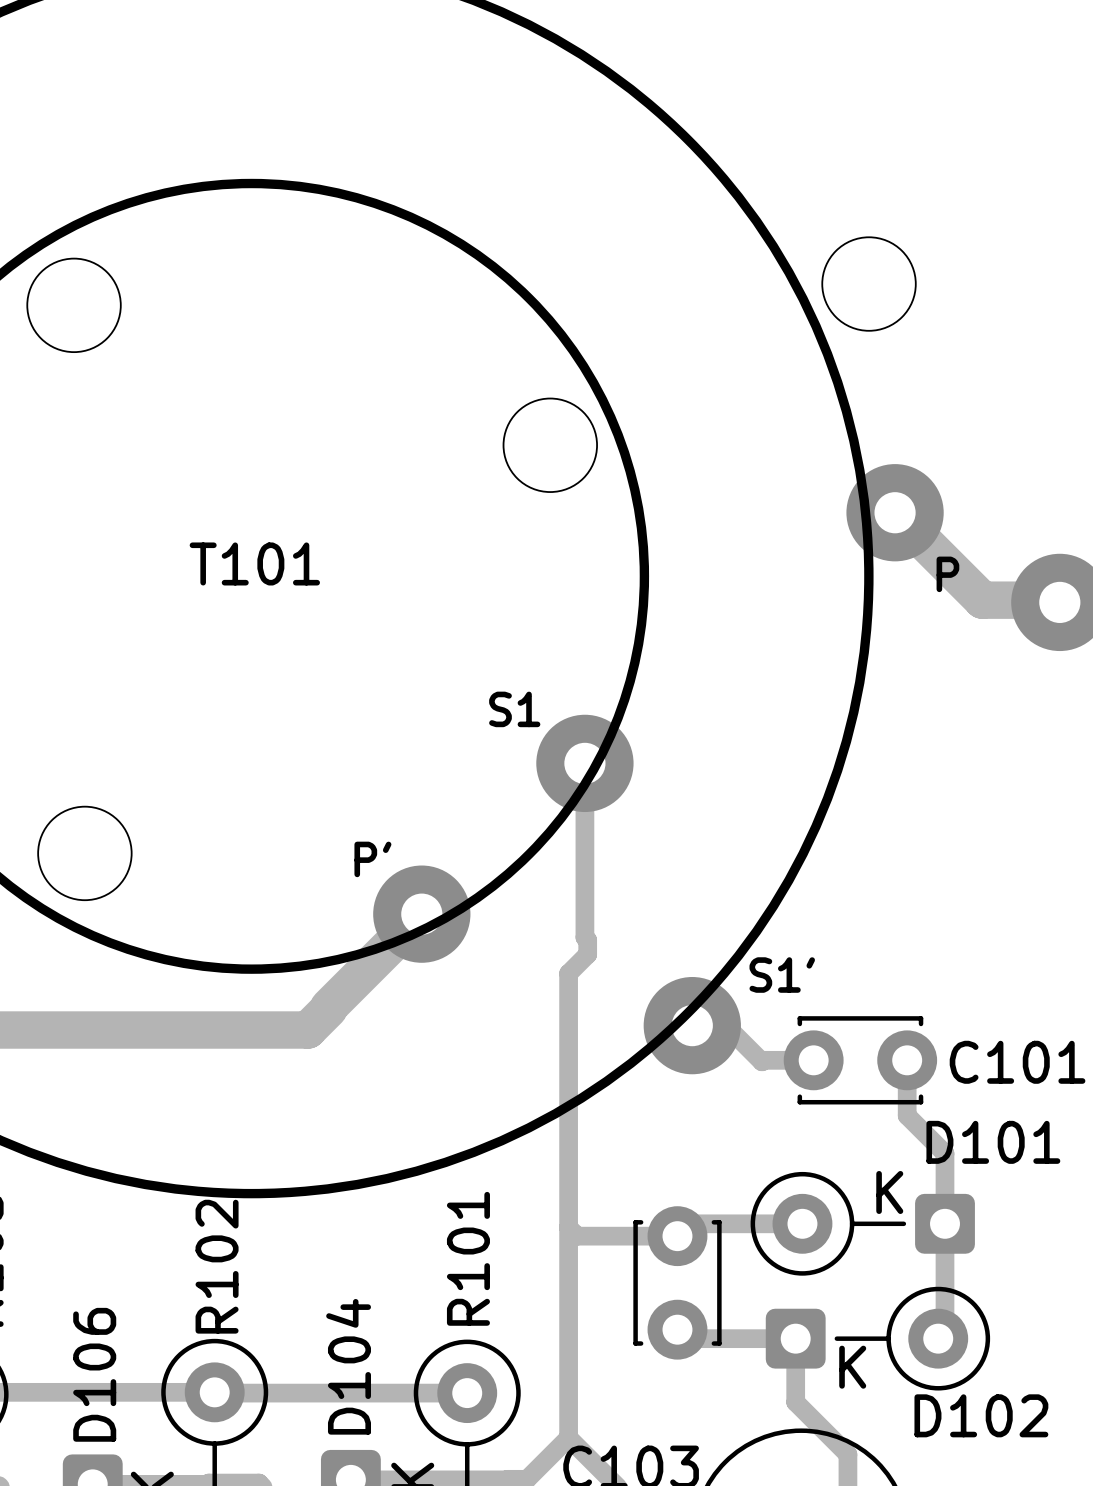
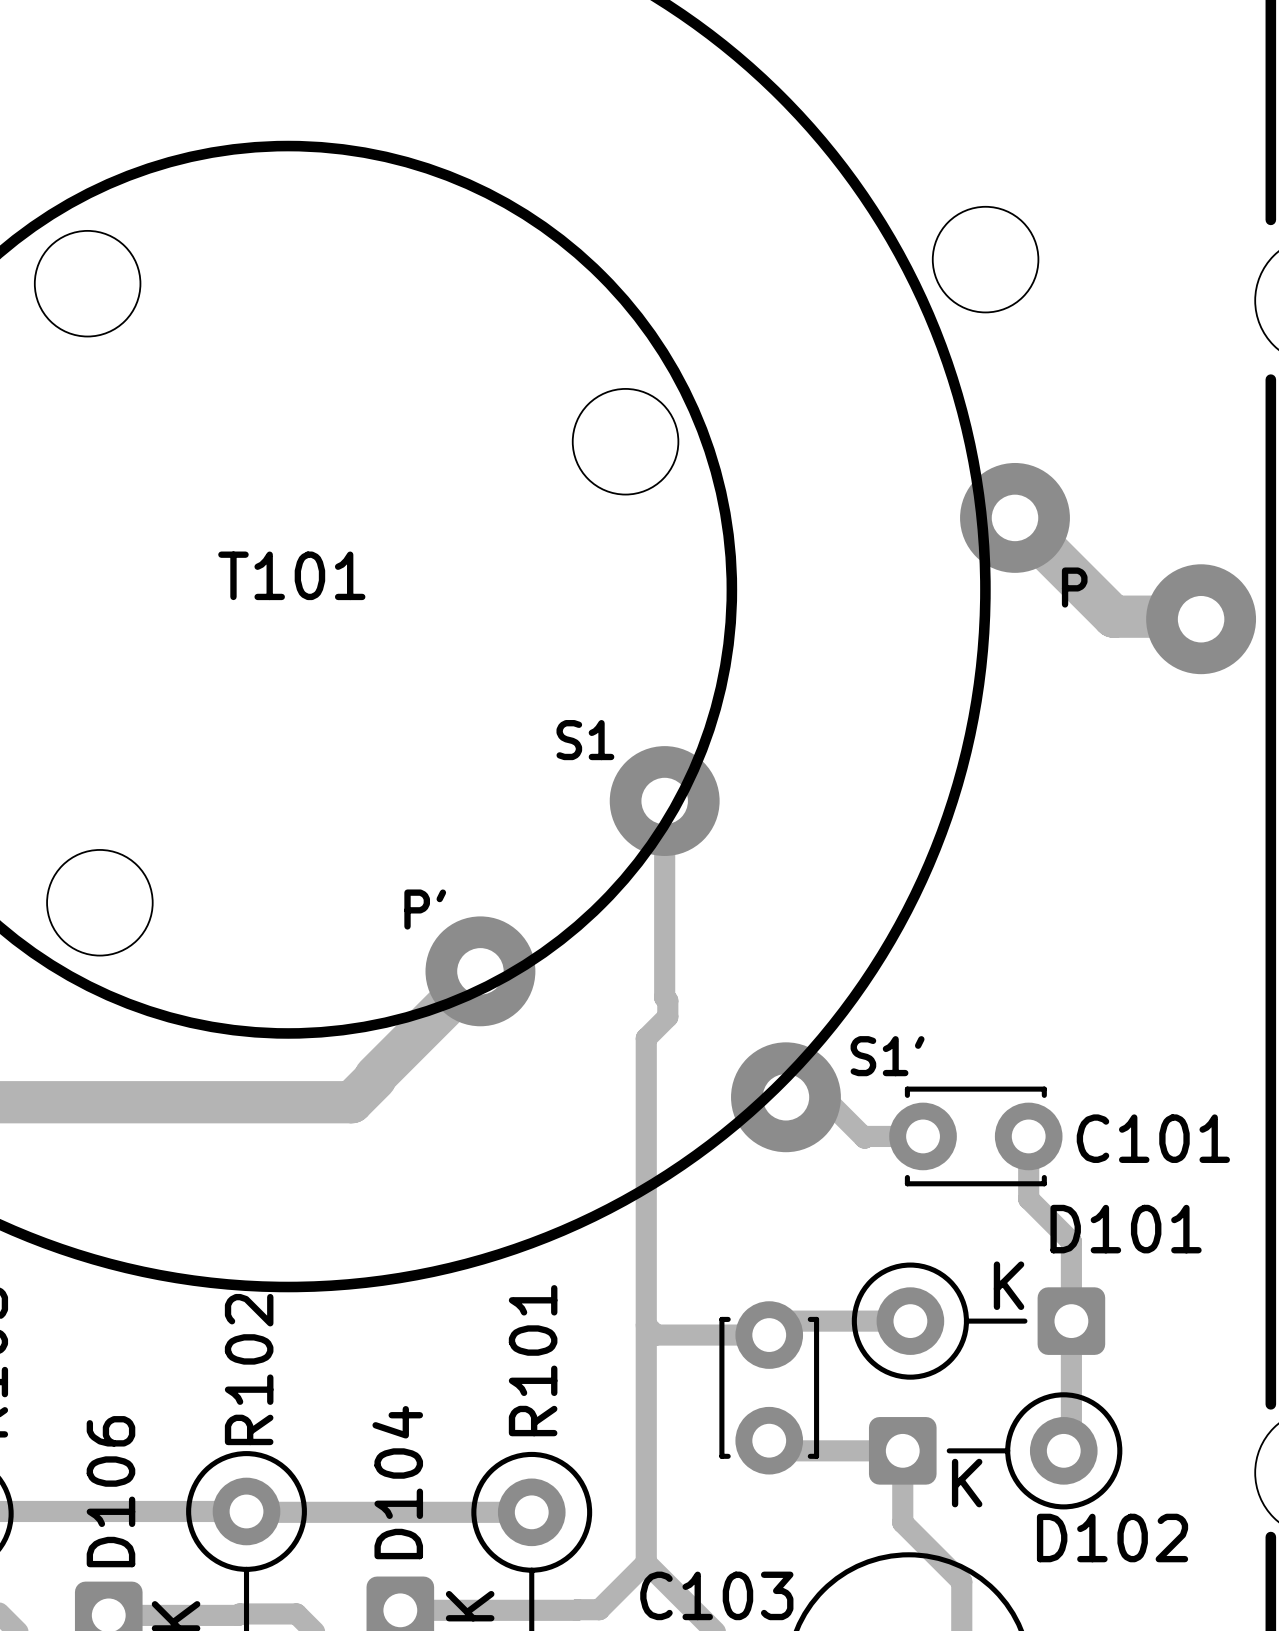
T101 text position: S1' (782, 975) -> S1' (887, 1056)

